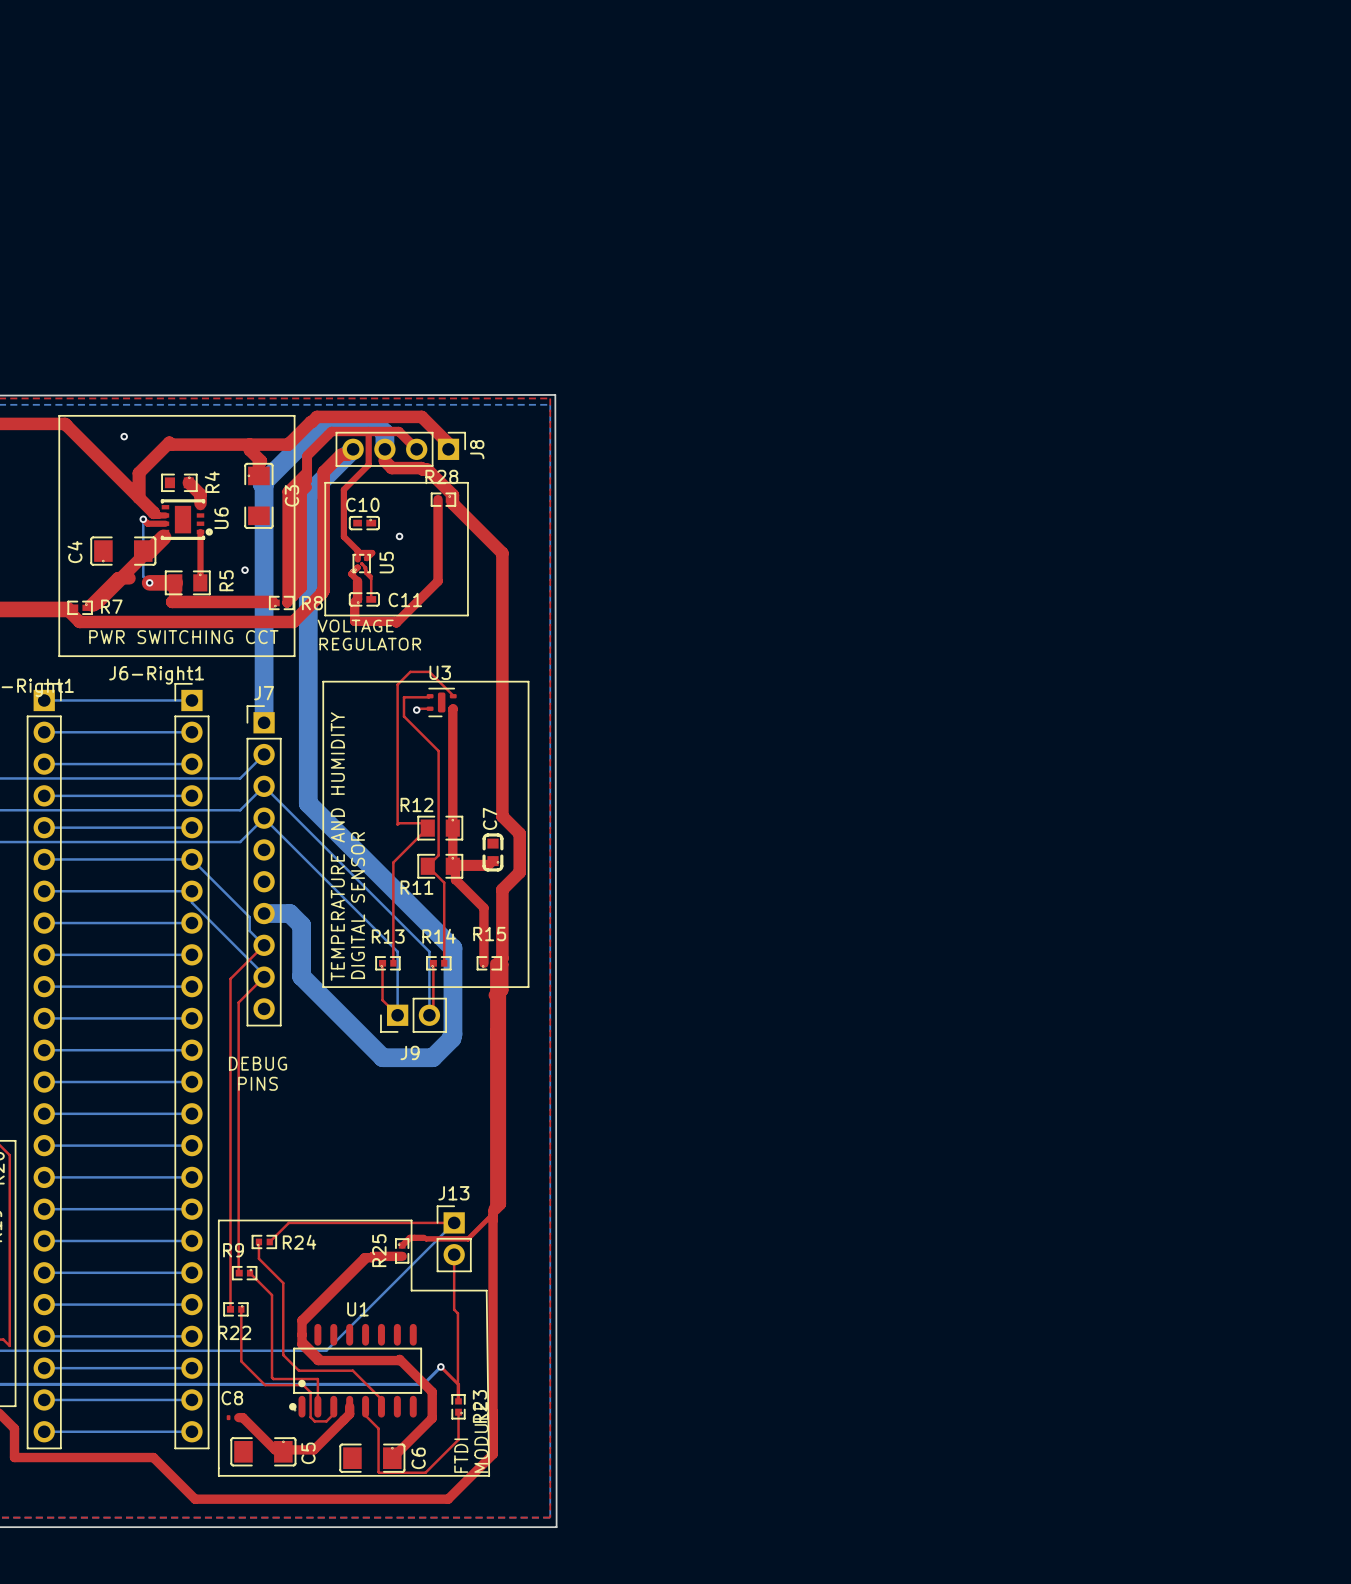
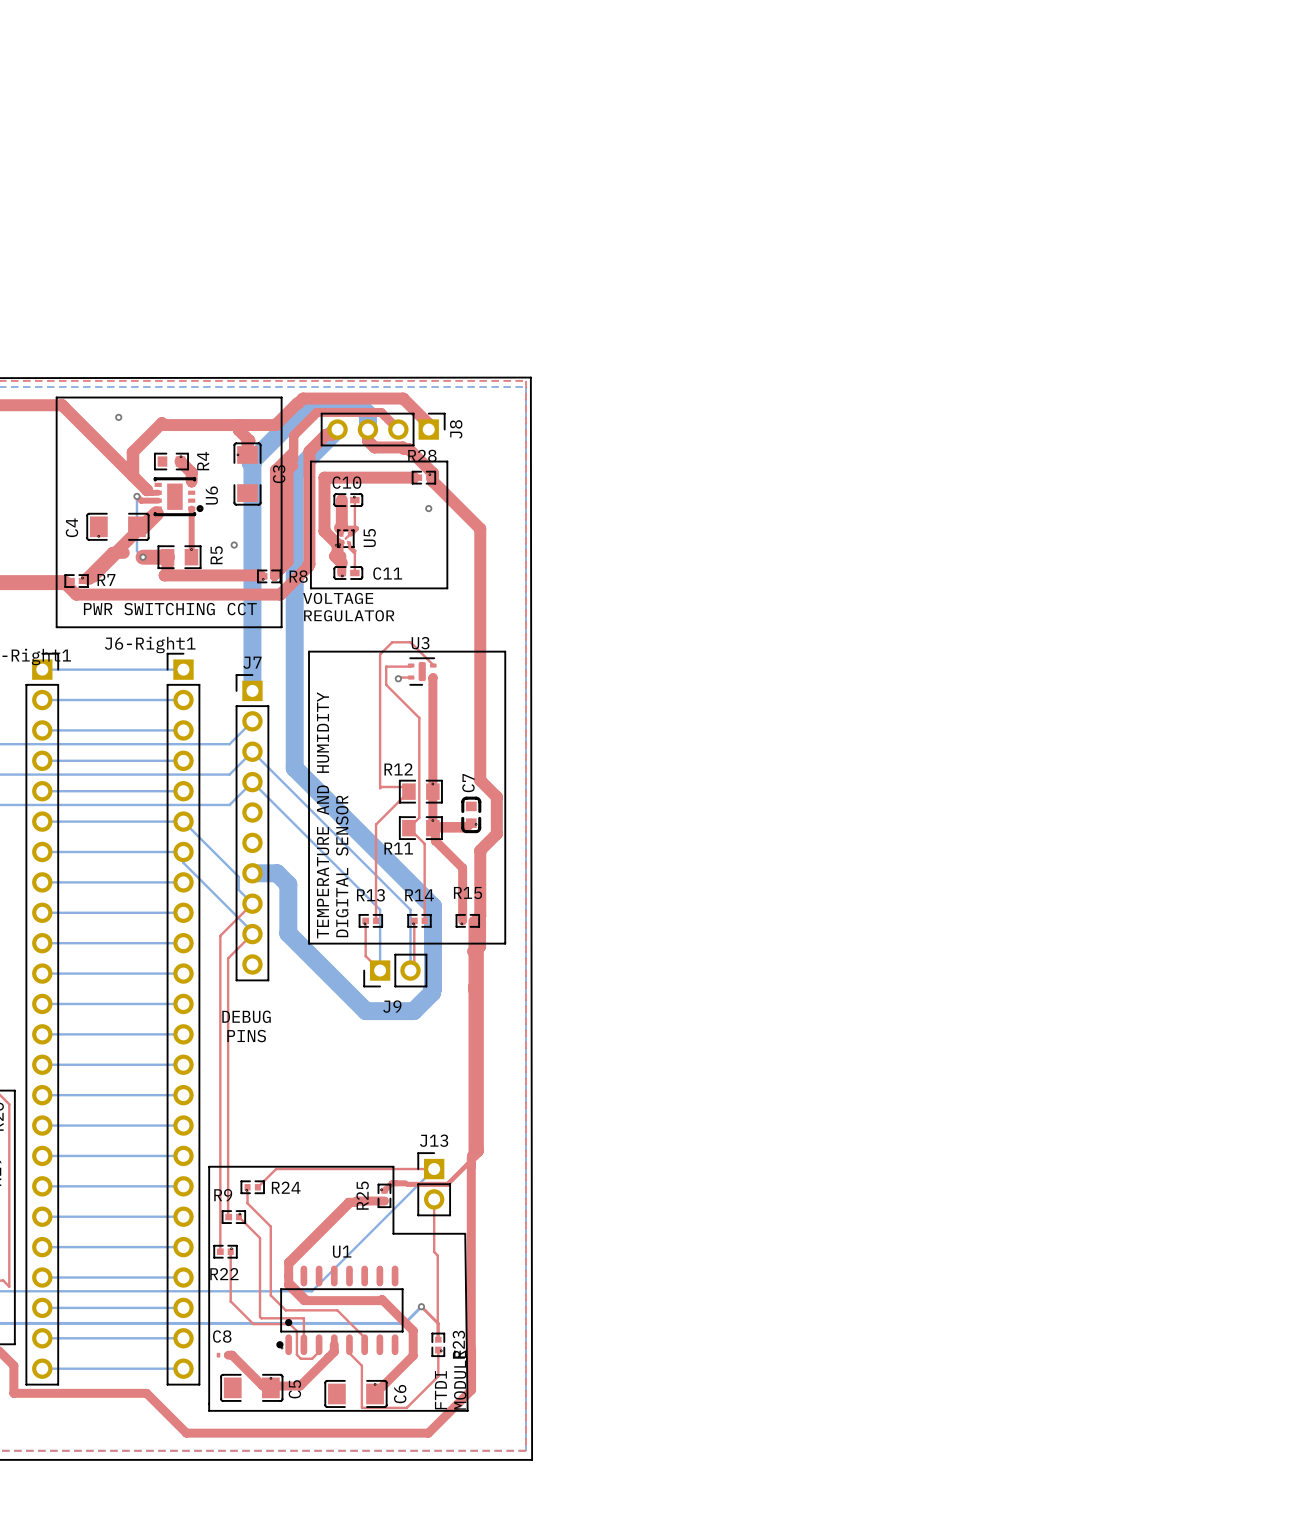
top track: (368, 431) (368, 464) (343, 489) (343, 536) (357, 550) (357, 559) -> none
top track: (438, 499) (438, 581) (396, 622) (394, 621) (354, 621) (354, 603) (357, 599) -> (418, 477) (324, 477) (324, 531) (337, 544) (337, 553) (335, 556) (341, 562)
top track: none -> (341, 500) (341, 534)
via position: (399, 536) -> (428, 508)
top track: (361, 563) (365, 567) -> (345, 538) (354, 529) (354, 500)

